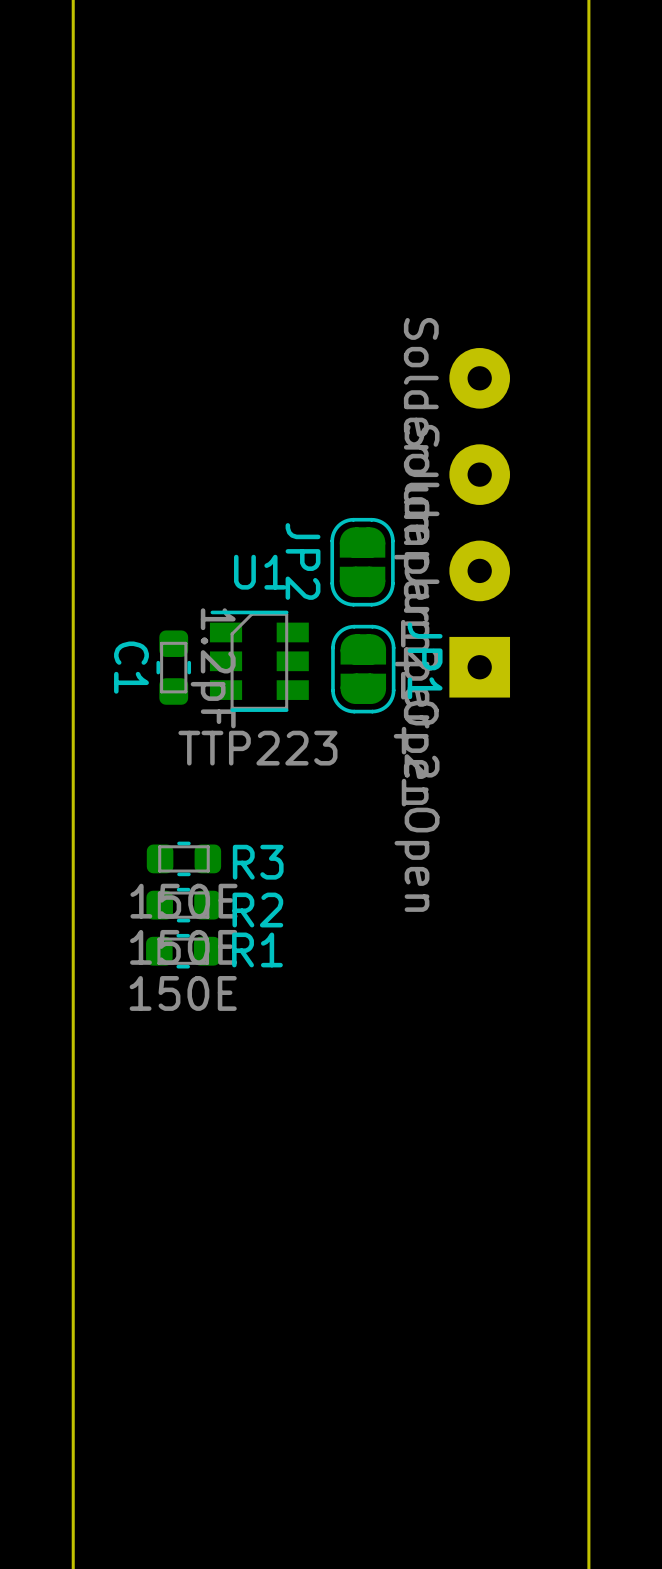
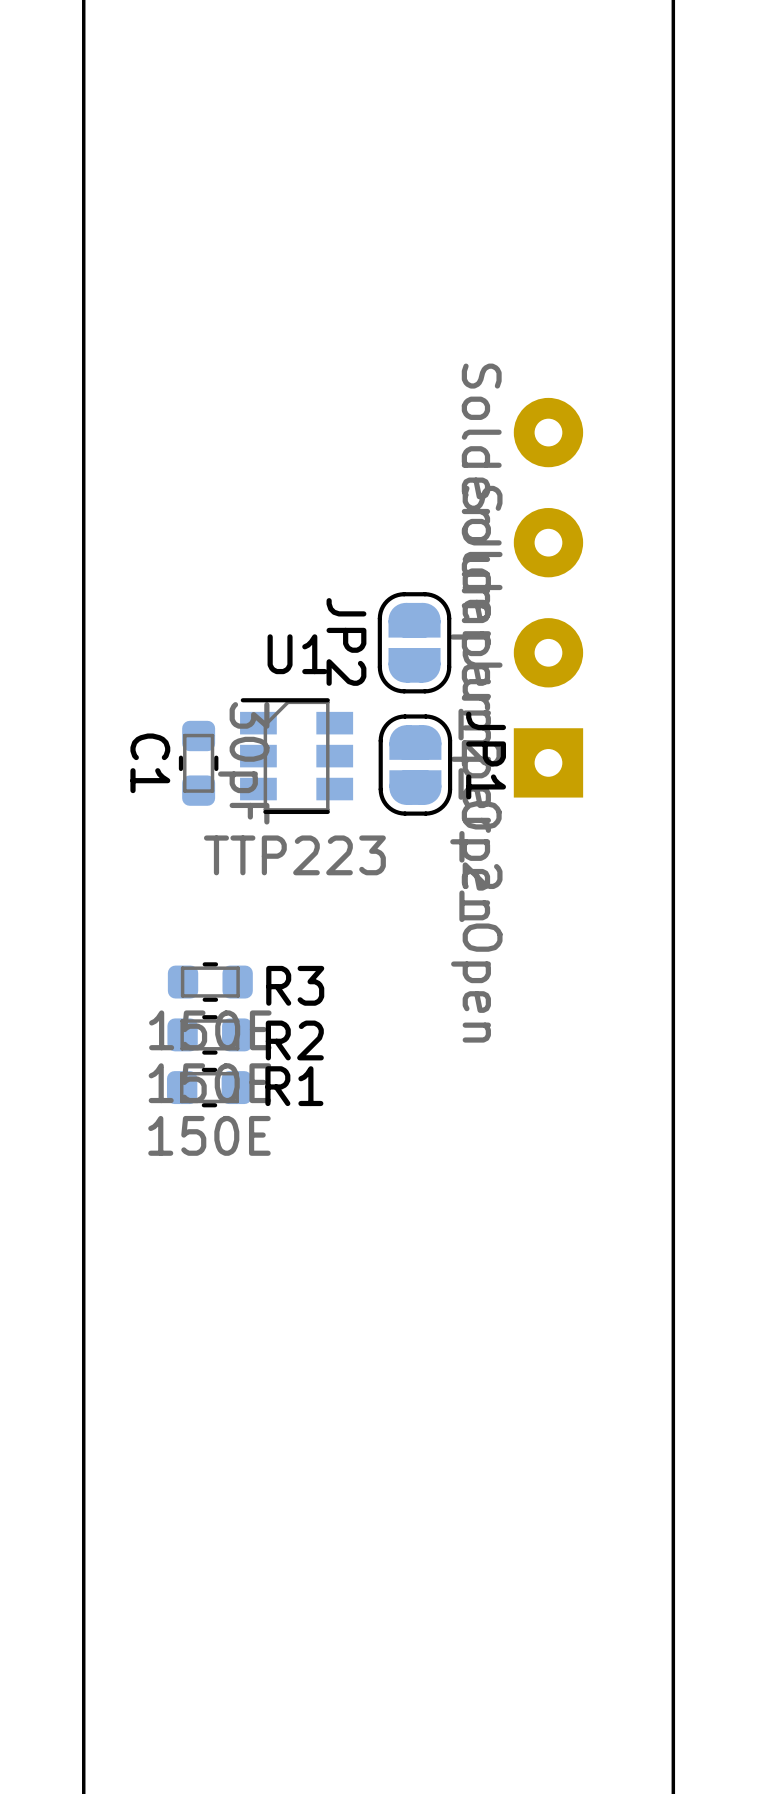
C1 value: 1.2pF (213, 668) -> 30pF (243, 763)

